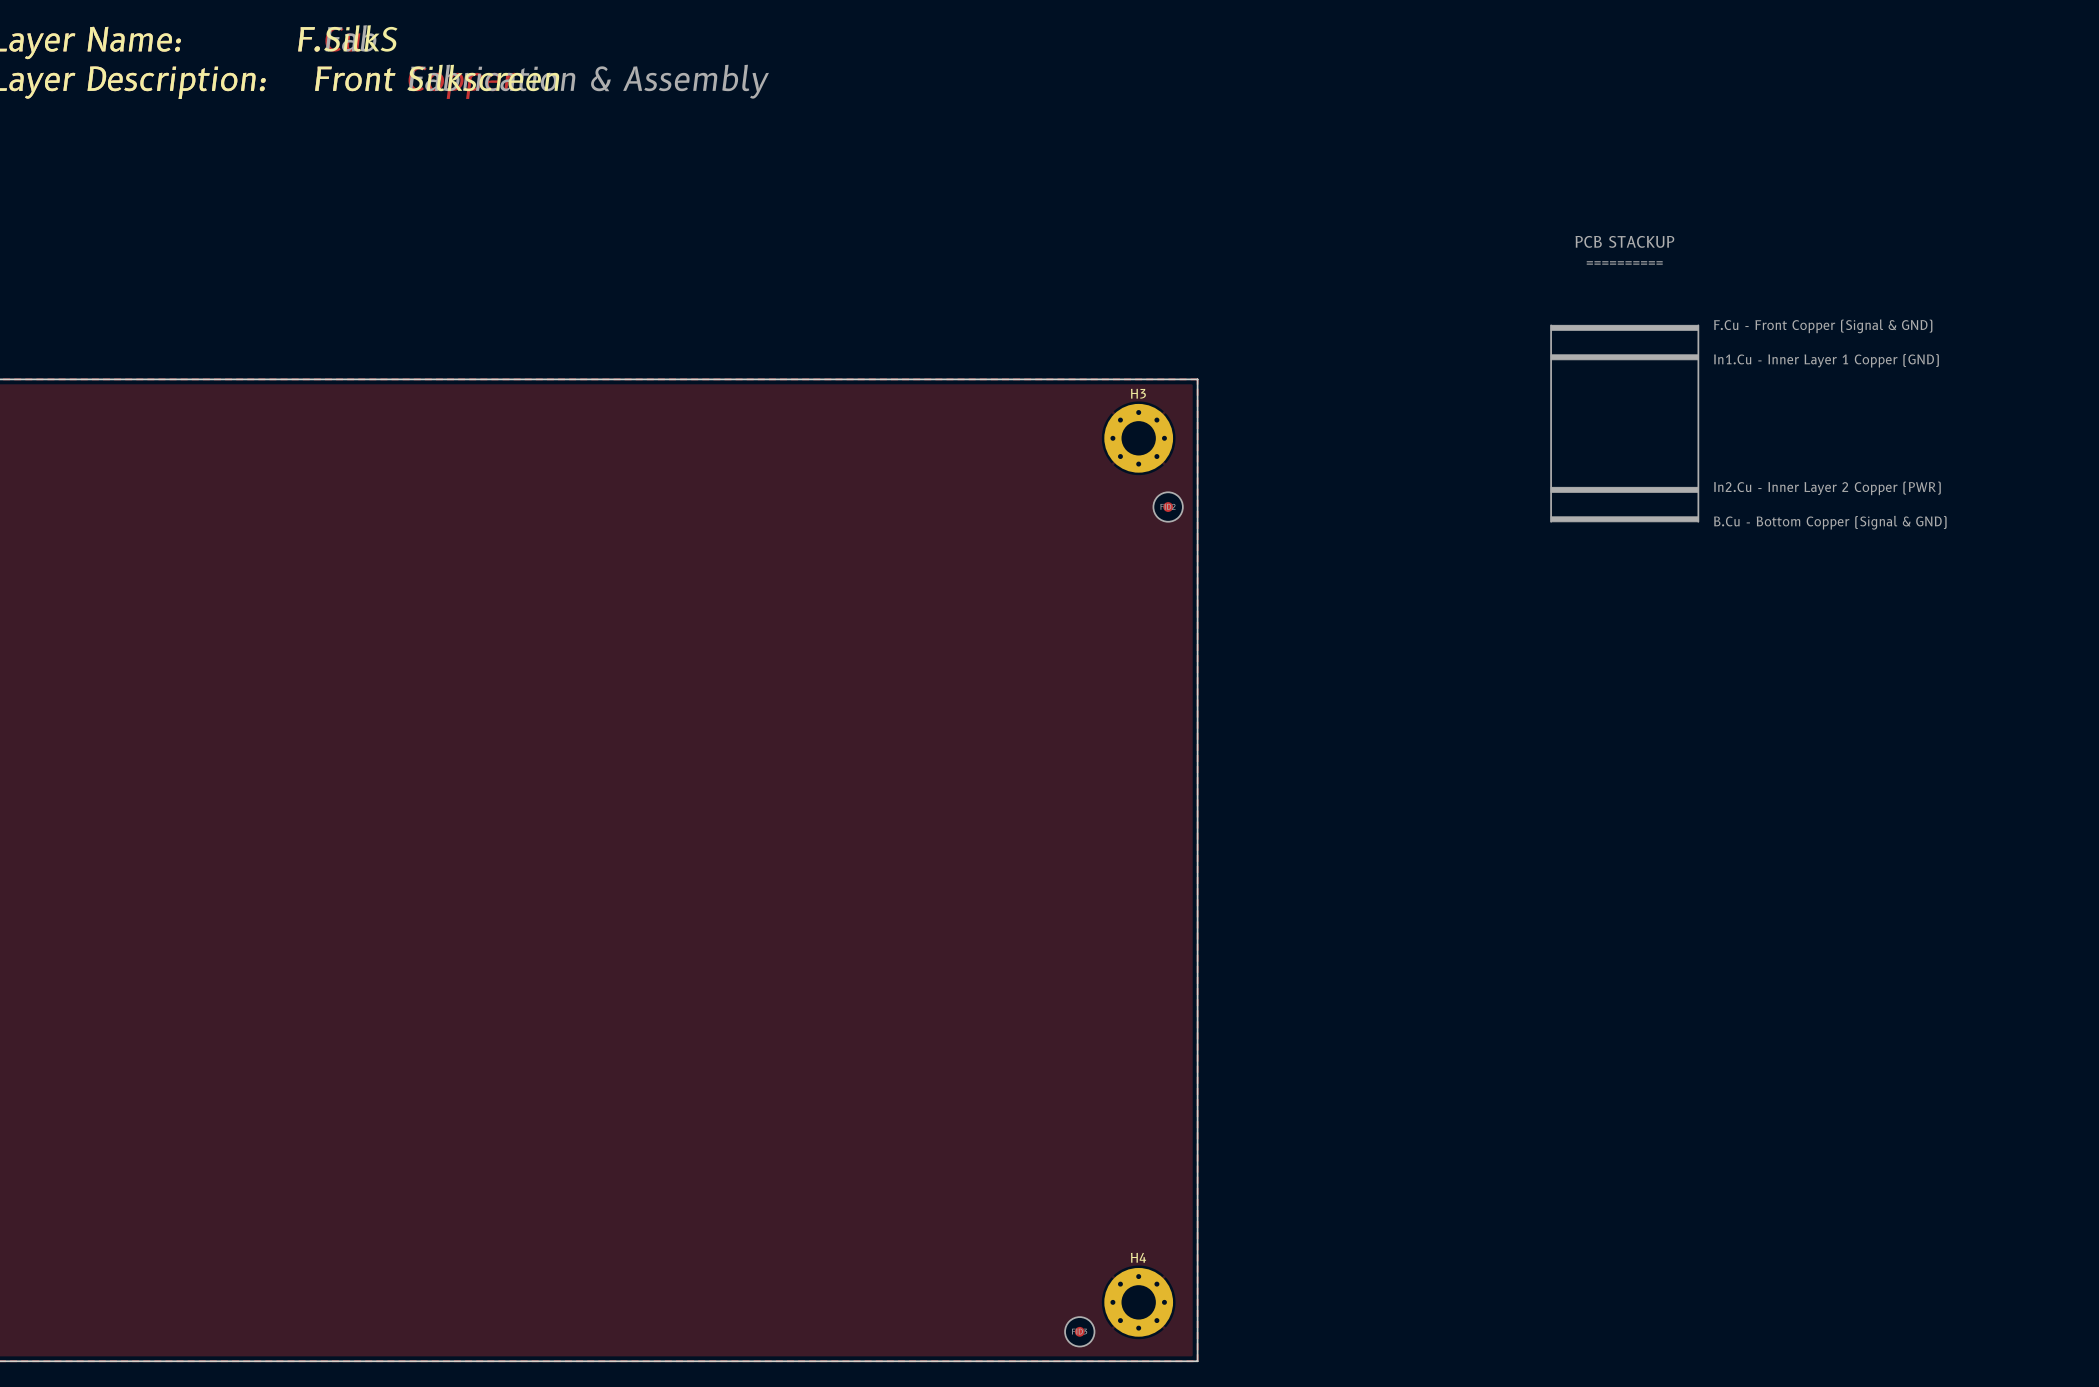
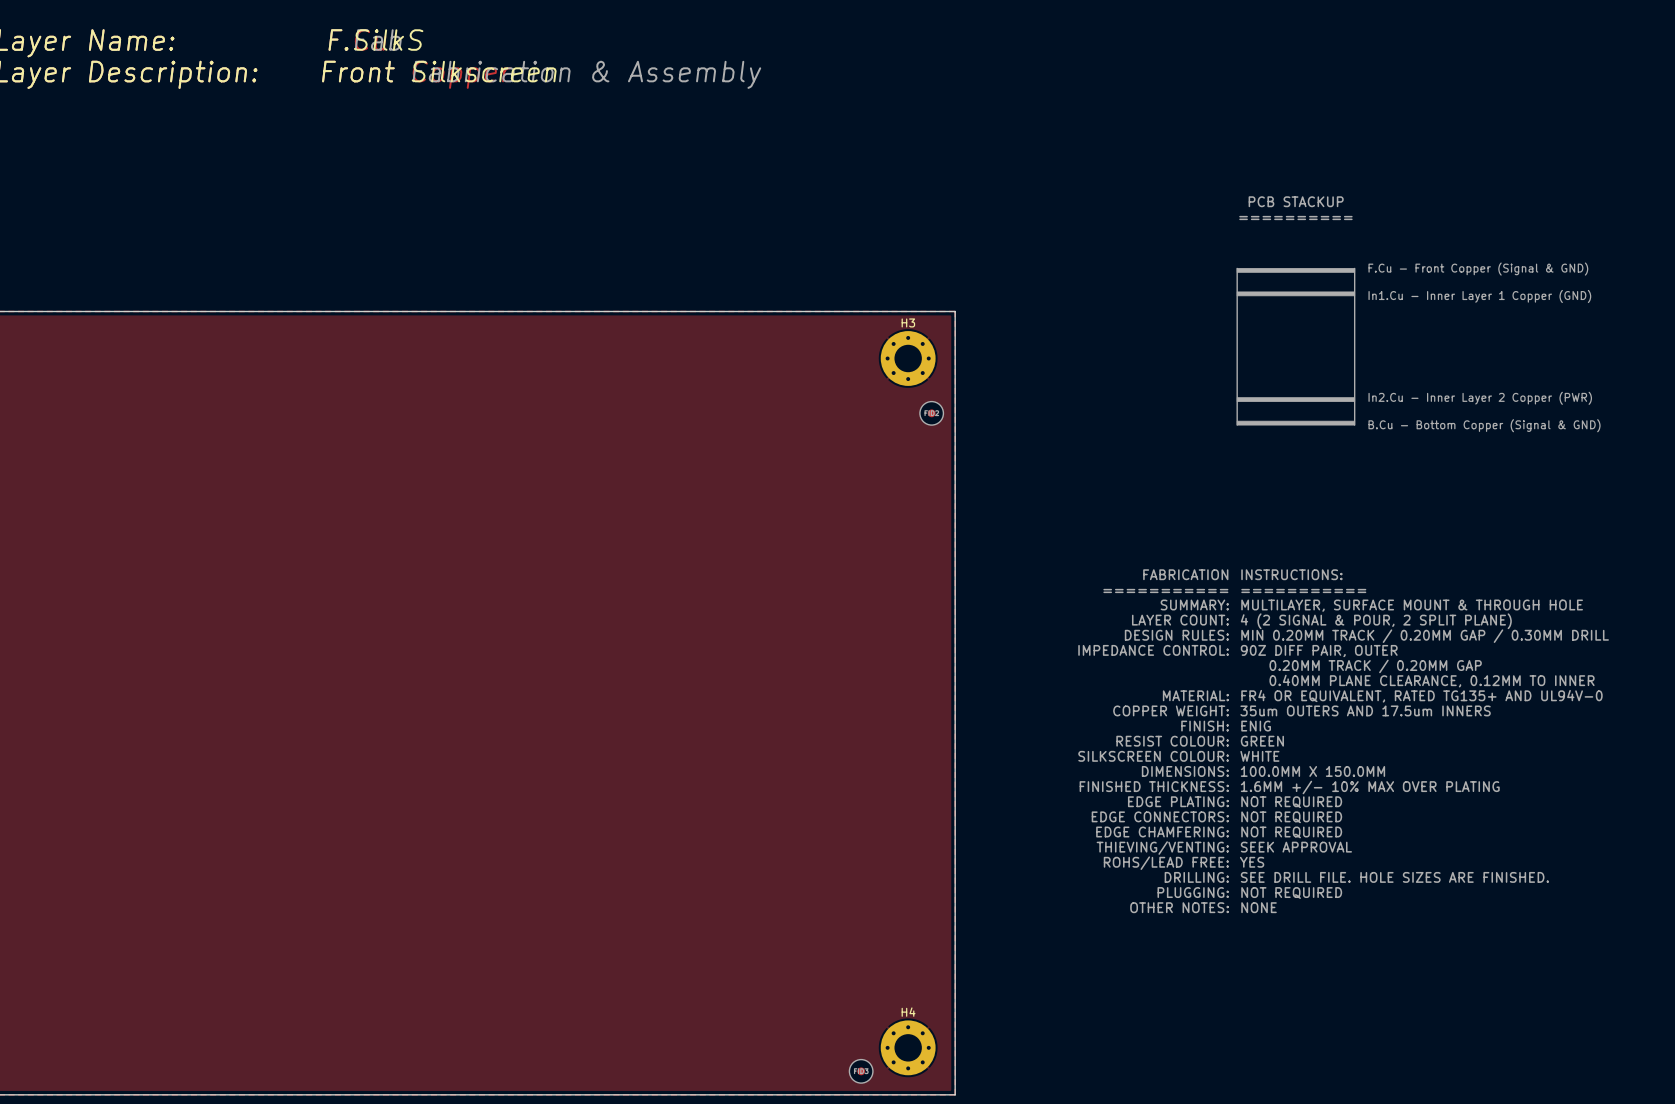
text: none -> FABRICATION (1185, 574)
text: none -> INSTRUCTIONS: (1291, 574)
text: none -> =========== (1165, 590)
text: none -> =========== (1303, 590)
text: none -> SUMMARY: (1194, 604)
text: none -> MULTILAYER, SURFACE MOUNT & THROUGH HOLE (1412, 605)
text: none -> LAYER COUNT: (1180, 620)
text: none -> 4 (2 SIGNAL & POUR, 2 SPLIT PLANE) (1376, 621)
text: none -> DESIGN RULES: (1176, 635)
text: none -> MIN 0.20MM TRACK / 0.20MM GAP / 0.30MM DRILL (1425, 636)
text: none -> IMPEDANCE CONTROL: (1153, 650)
text: none -> 90Z DIFF PAIR, OUTER (1319, 651)
text: none -> 0.20MM TRACK / 0.20MM GAP (1375, 666)
text: none -> 0.40MM PLANE CLEARANCE, 0.12MM TO INNER (1432, 681)
text: none -> MATERIAL: (1195, 695)
text: none -> FR4 OR EQUIVALENT, RATED TG135+ AND UL94V-0 (1421, 696)
text: none -> COPPER WEIGHT: (1171, 710)
text: none -> 35um OUTERS AND 17.5um INNERS (1365, 710)
text: none -> FINISH: (1205, 726)
text: none -> ENIG (1256, 726)
text: none -> RESIST COLOUR: (1172, 741)
text: none -> GREEN (1262, 741)
text: none -> WHITE (1259, 756)
text: none -> SILKSCREEN COLOUR: (1153, 756)
text: none -> DIMENSIONS: (1185, 771)
text: none -> 100.0MM X 150.0MM (1312, 771)
text: none -> FINISHED THICKNESS: (1154, 786)
text: none -> 1.6MM +/- 10% MAX OVER PLATING (1370, 787)
text: none -> EDGE PLATING: (1178, 801)
text: none -> NOT REQUIRED (1291, 802)
text: none -> EDGE CONNECTORS: (1160, 816)
text: none -> NOT REQUIRED (1291, 817)
text: none -> EDGE CHAMFERING: (1162, 832)
text: none -> NOT REQUIRED (1291, 832)
text: none -> THIEVING/VENTING: (1162, 848)
text: none -> SEEK APPROVAL (1296, 847)
text: none -> ROHS/LEAD FREE: (1166, 863)
text: none -> YES (1252, 862)
text: none -> DRILLING: (1196, 877)
text: none -> SEE DRILL FILE. HOLE SIZES ARE FINISHED. (1394, 877)
text: none -> PLUGGING: (1193, 892)
text: none -> NOT REQUIRED (1291, 892)
text: none -> OTHER NOTES: (1179, 907)
text: none -> NONE (1259, 907)

